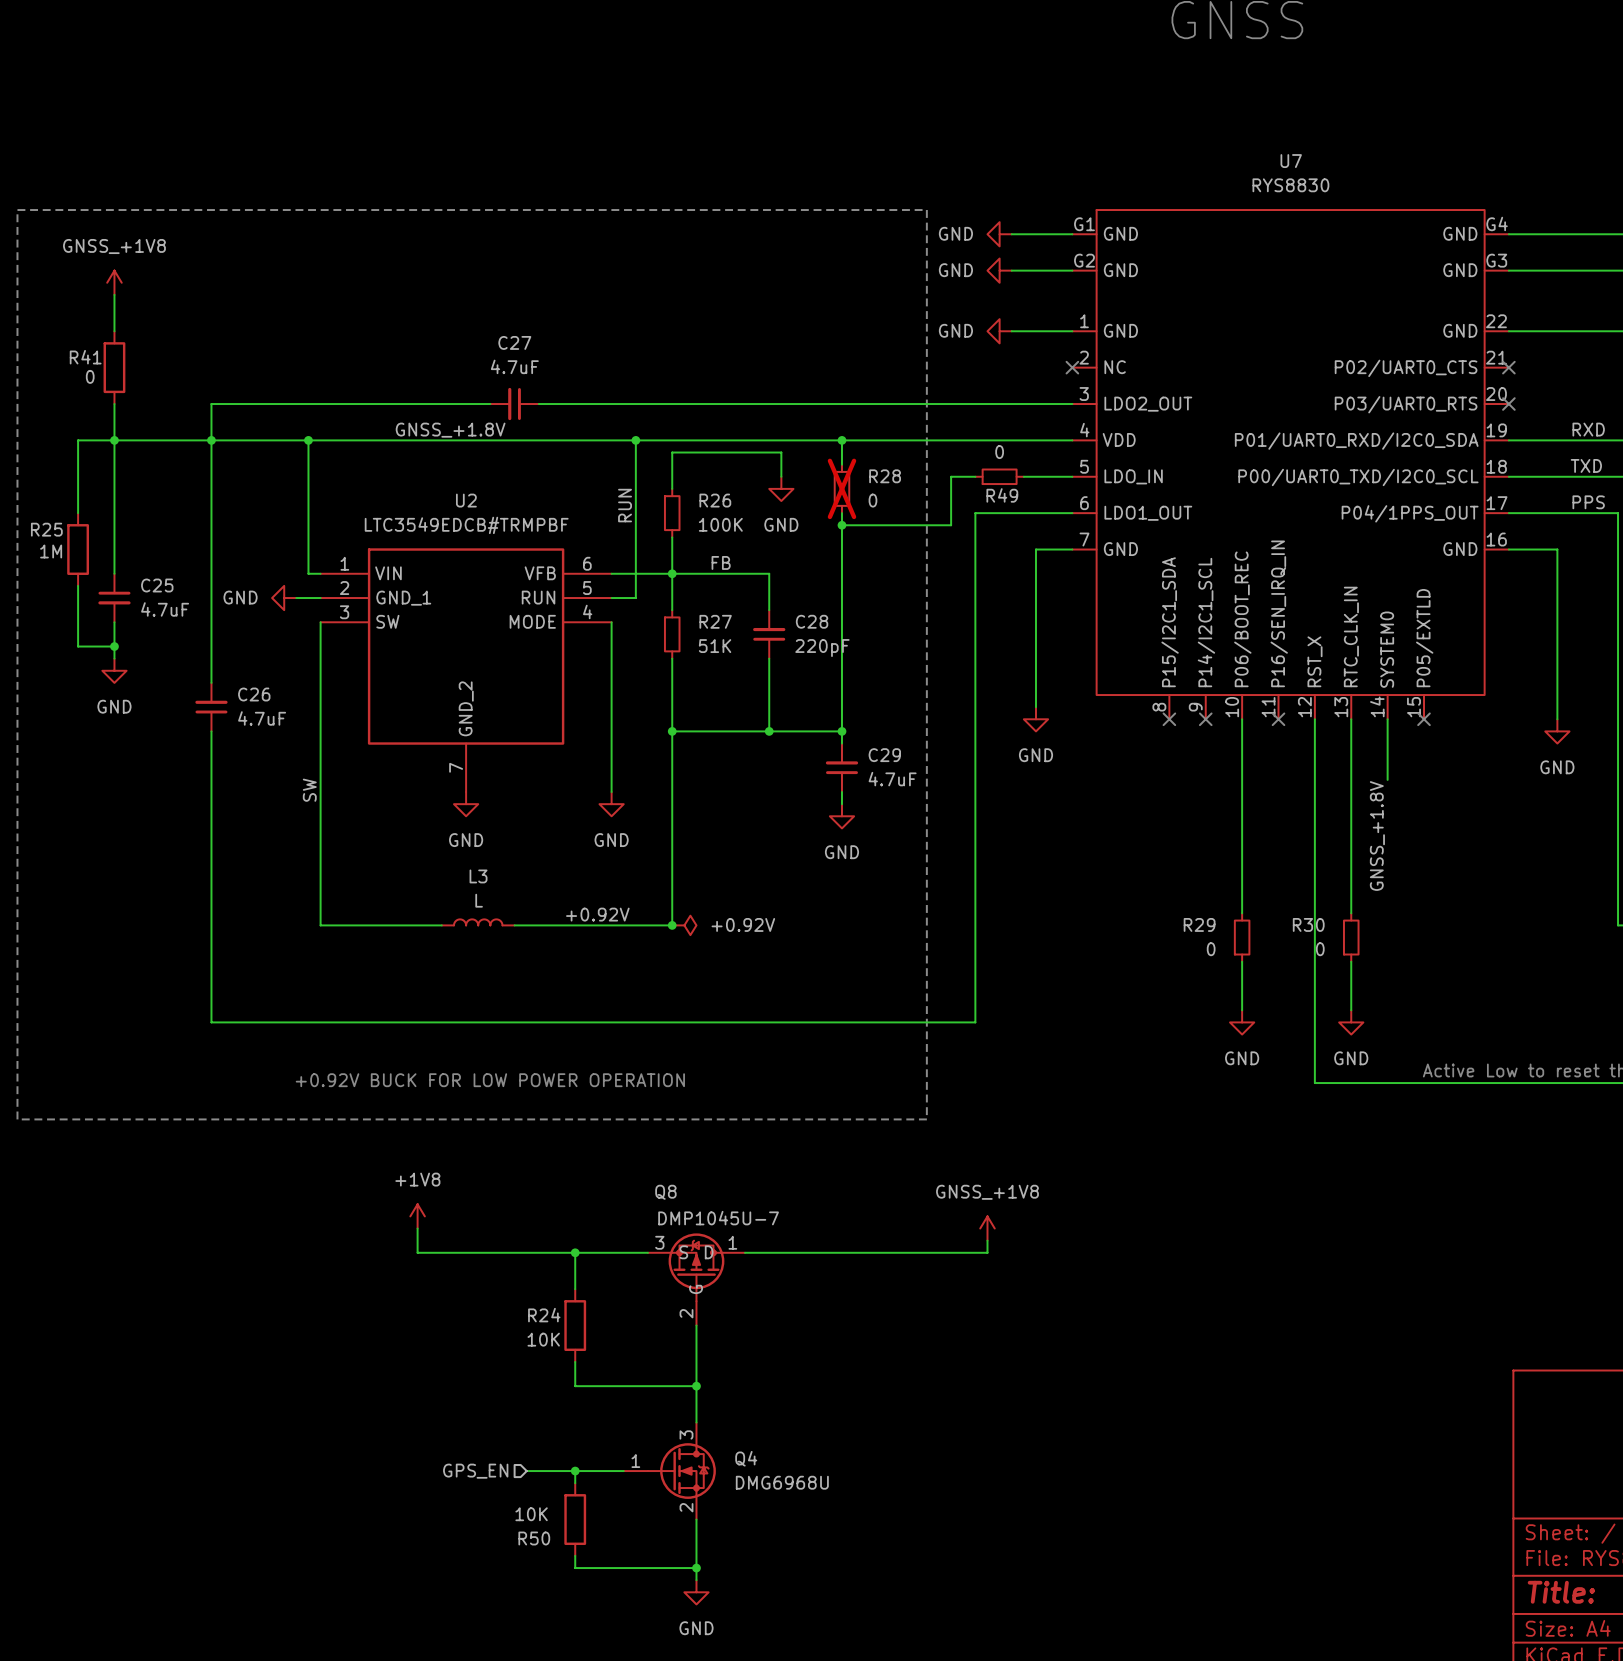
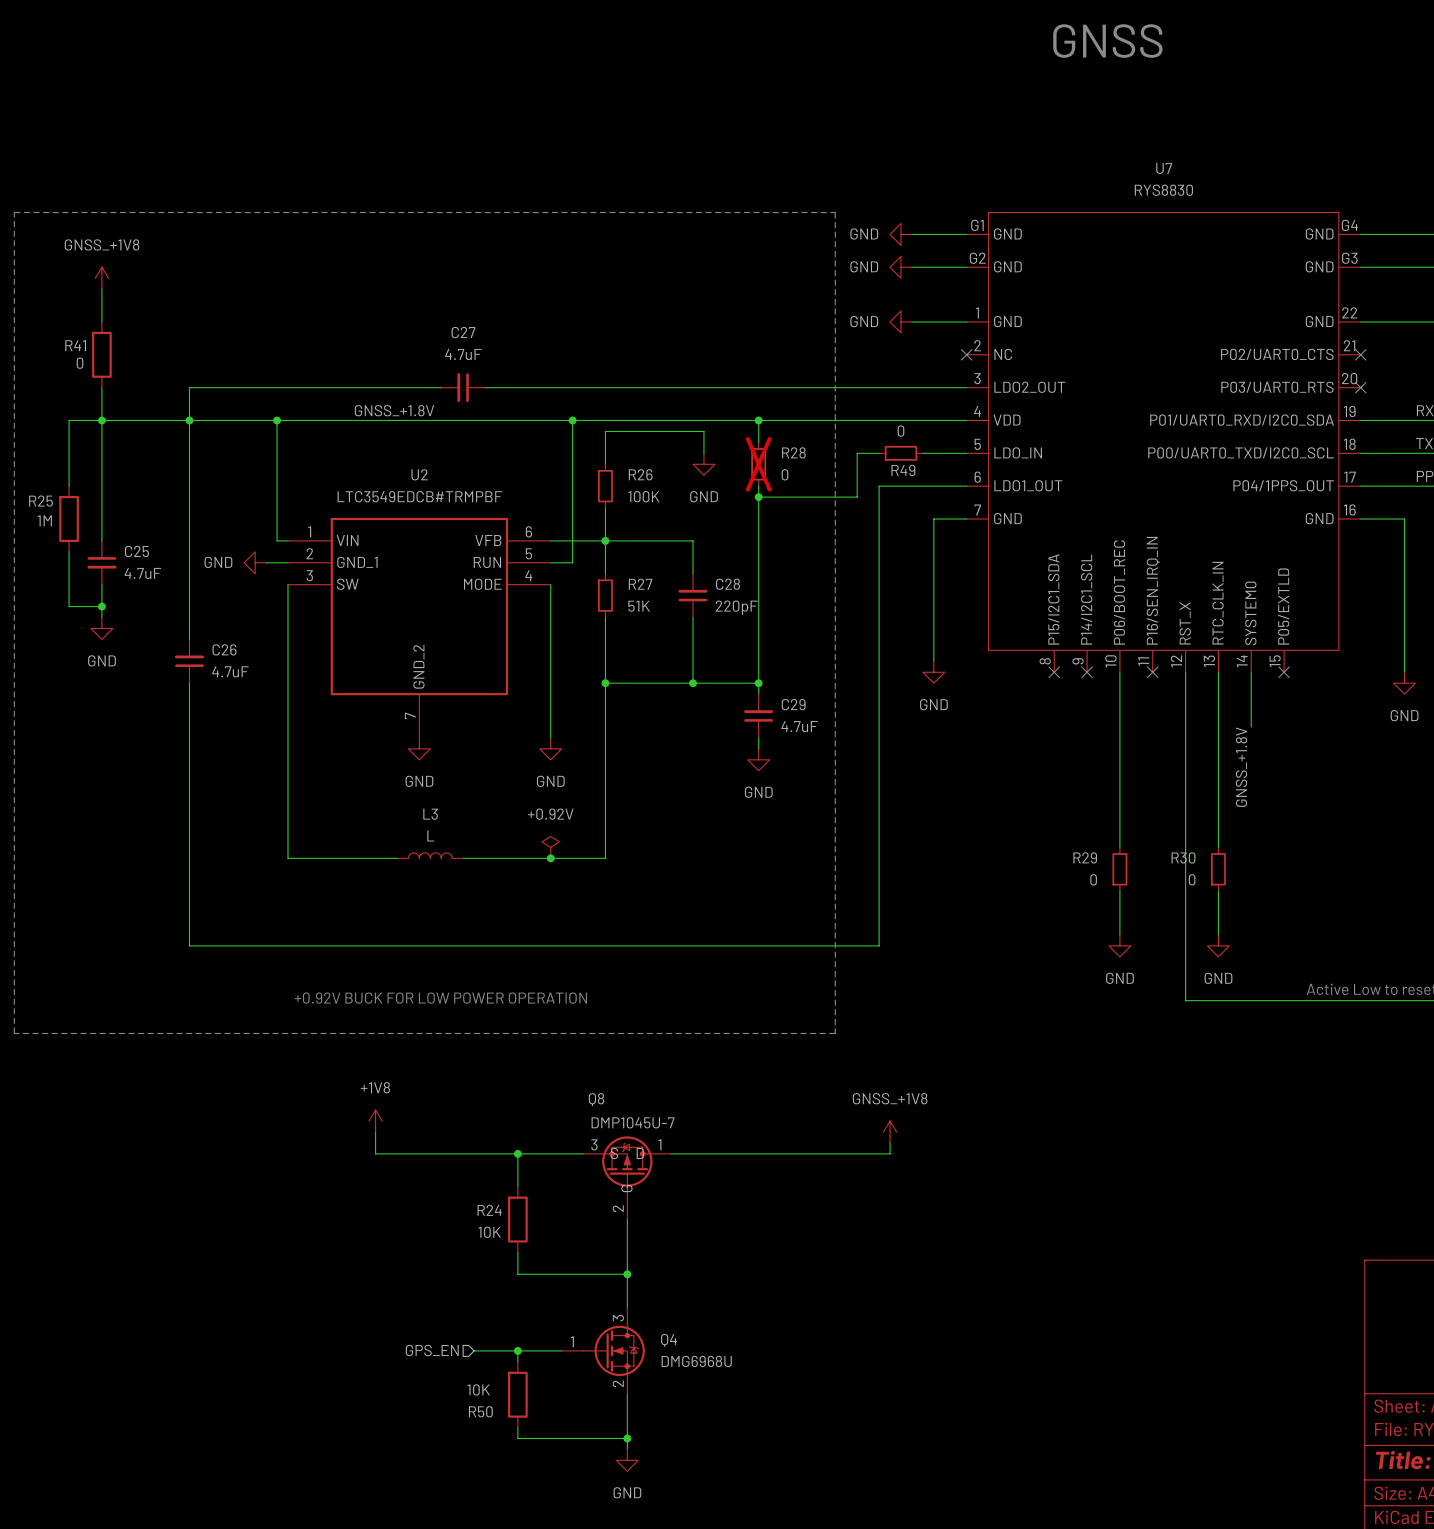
label: RUN (625, 505) -> none
label: FB (721, 562) -> none
label: SW (309, 790) -> none
label: +0.92V (597, 914) -> none
power symbol text position: +0.92V (743, 924) -> +0.92V (550, 814)
junction: none -> (550, 858)
junction: (672, 925) -> none
power symbol rotation: 0° (684, 925) -> 90° counterclockwise (550, 847)
power symbol position: +0.92V (684, 925) -> +0.92V (550, 847)

